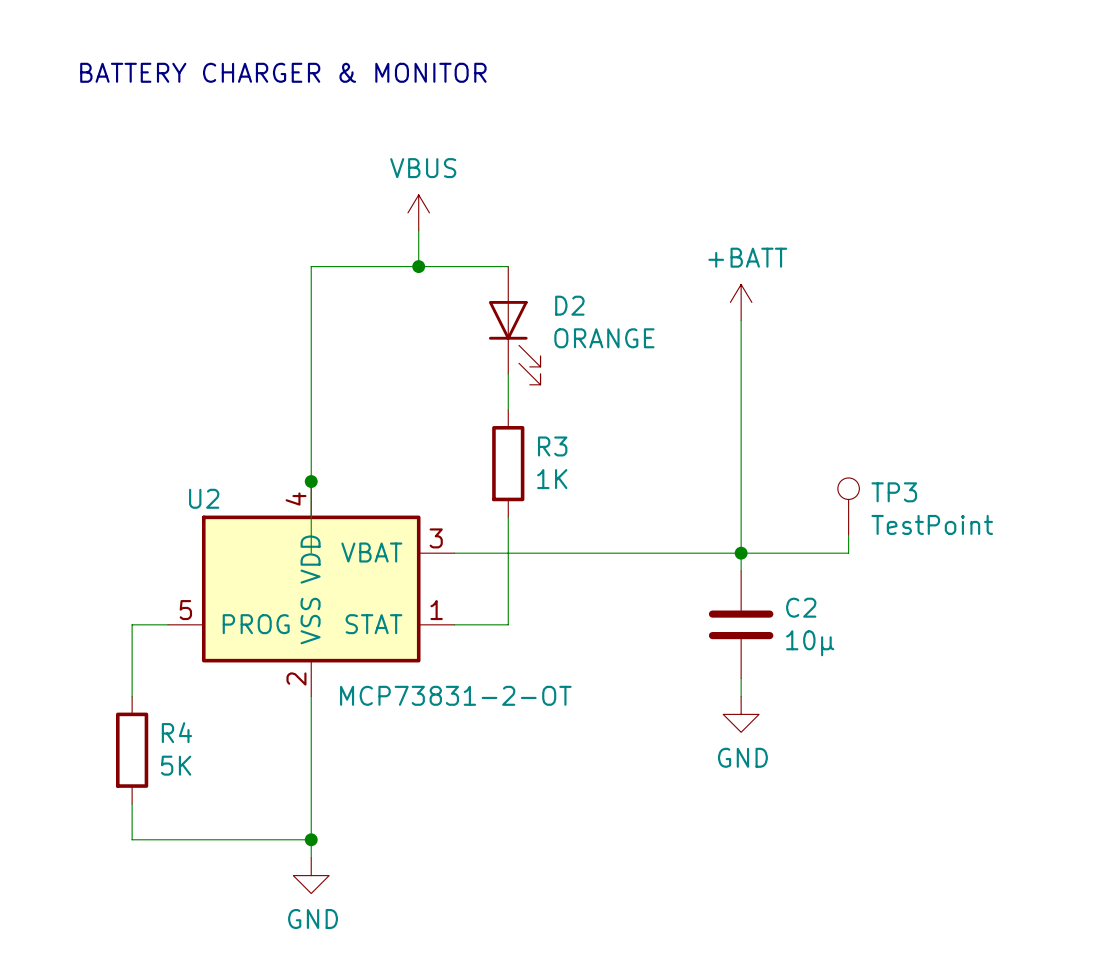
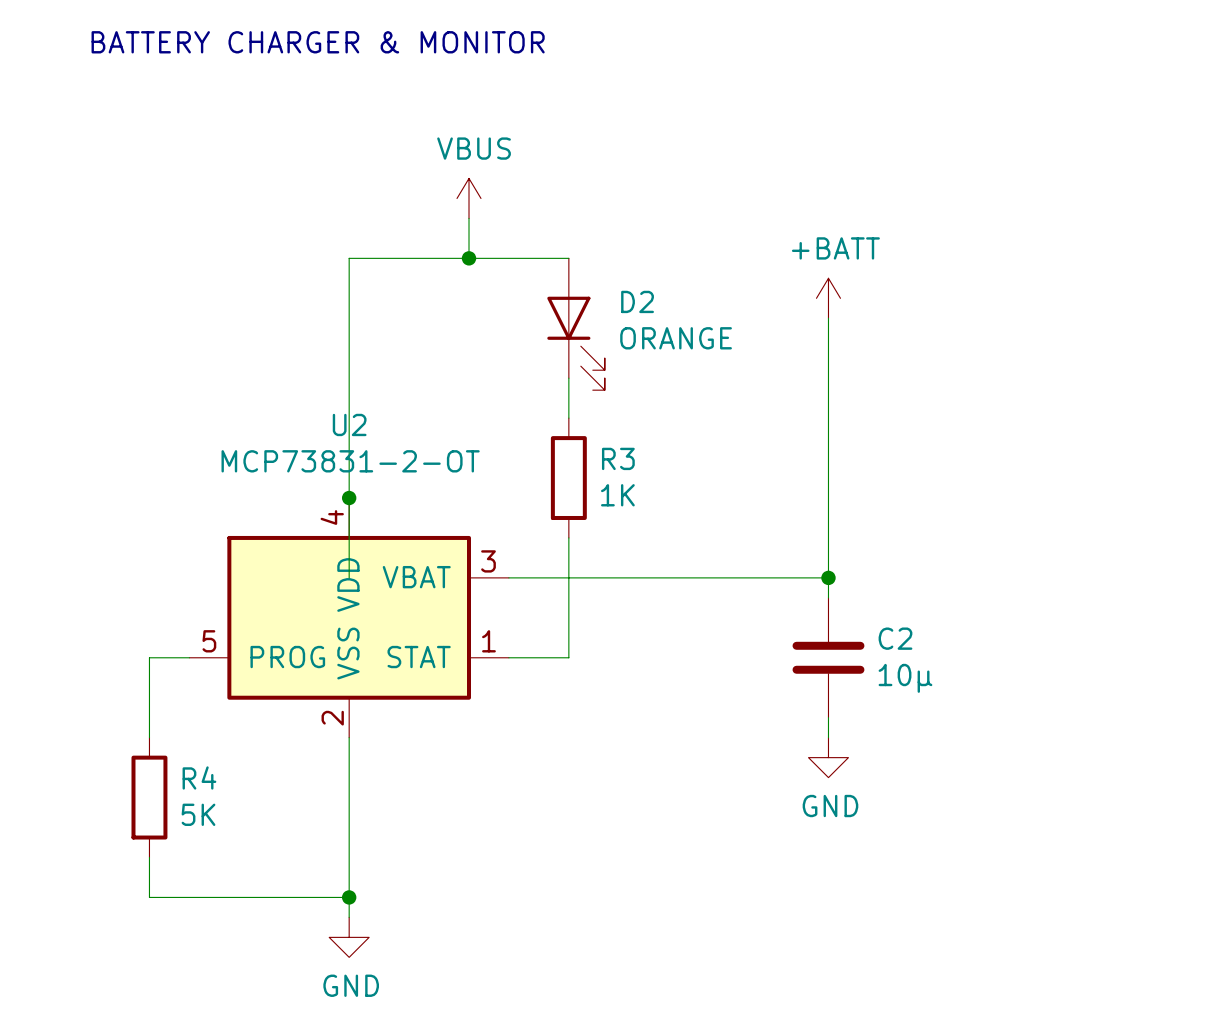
U2 name position: U2 (204, 498) -> U2 (349, 424)
TP3: TestPoint (848, 506) -> none
wire: (848, 535) (848, 553) (741, 553) -> none
U2 value position: MCP73831-2-OT (455, 695) -> MCP73831-2-OT (350, 461)

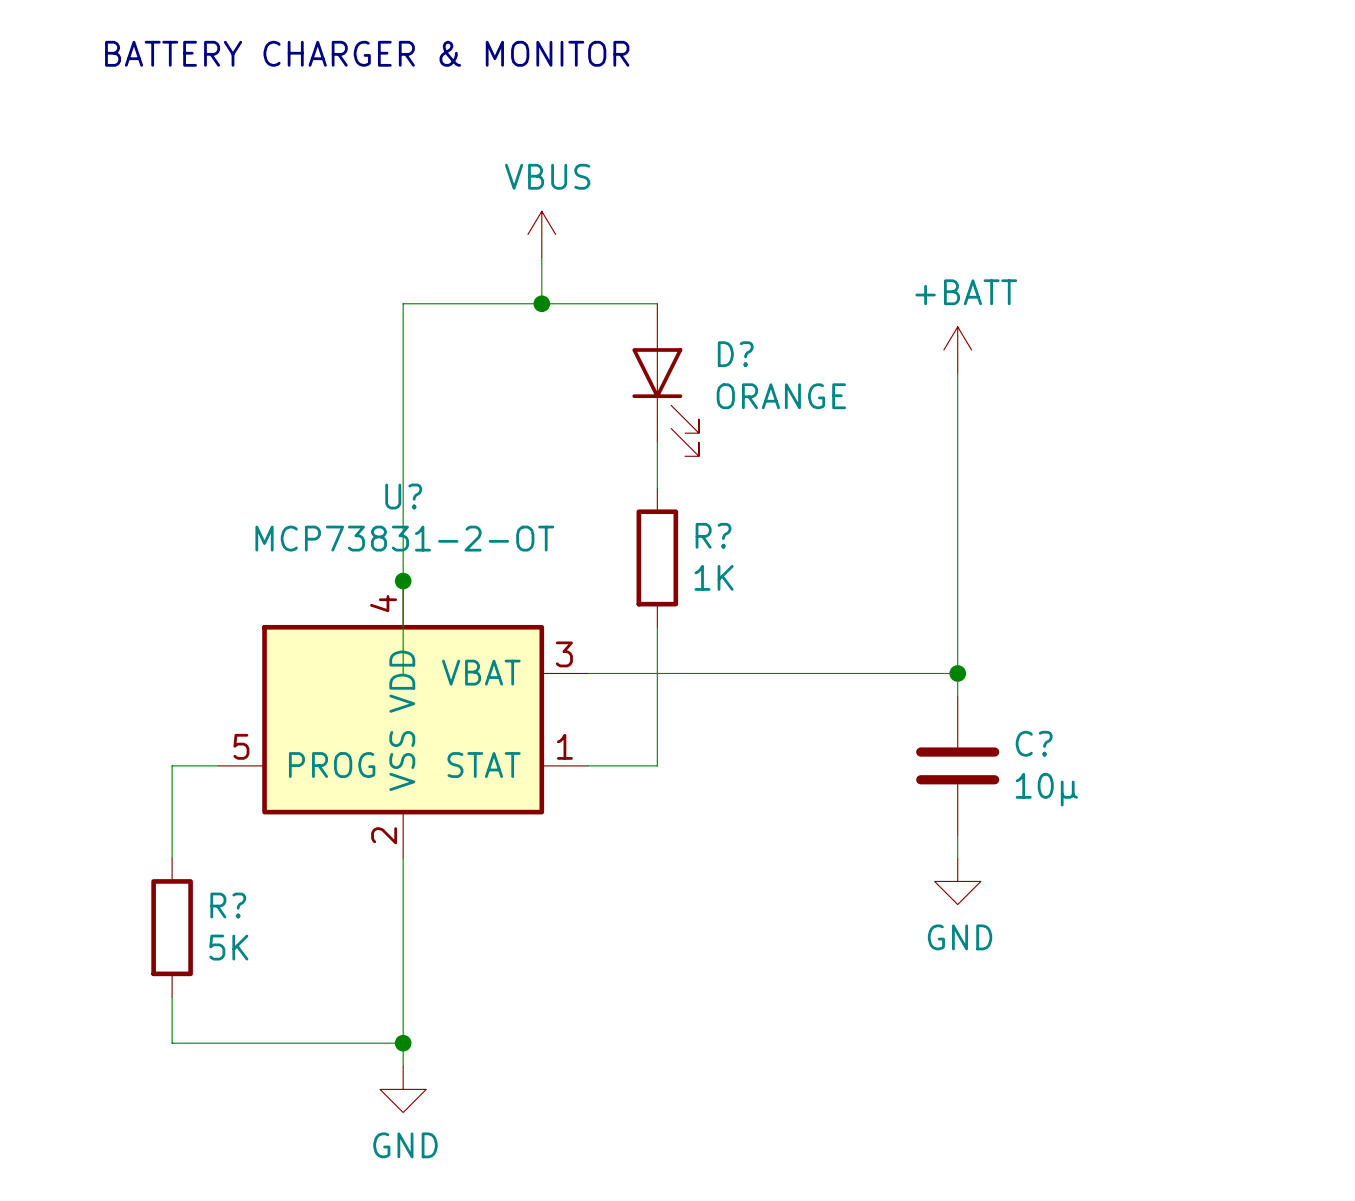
D2 name: D2 (637, 301) -> D? (735, 354)
U2 name: U2 (349, 424) -> U? (403, 496)
R3 name: R3 (618, 458) -> R? (713, 535)
C2 name: C2 (895, 638) -> C? (1034, 743)
R4 name: R4 (199, 777) -> R? (228, 905)

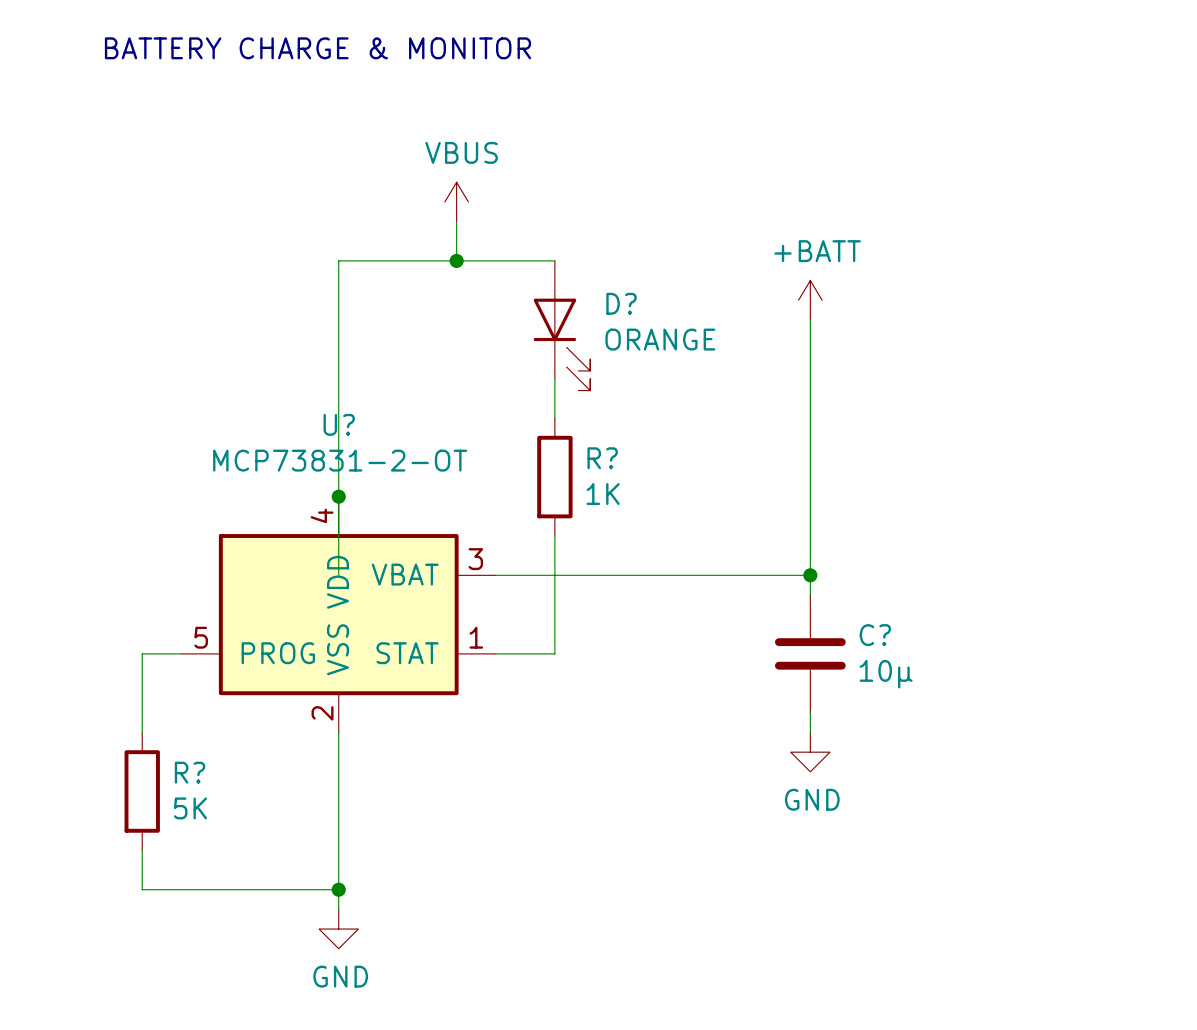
text: BATTERY CHARGER & MONITOR (367, 53) -> BATTERY CHARGE & MONITOR (318, 48)

